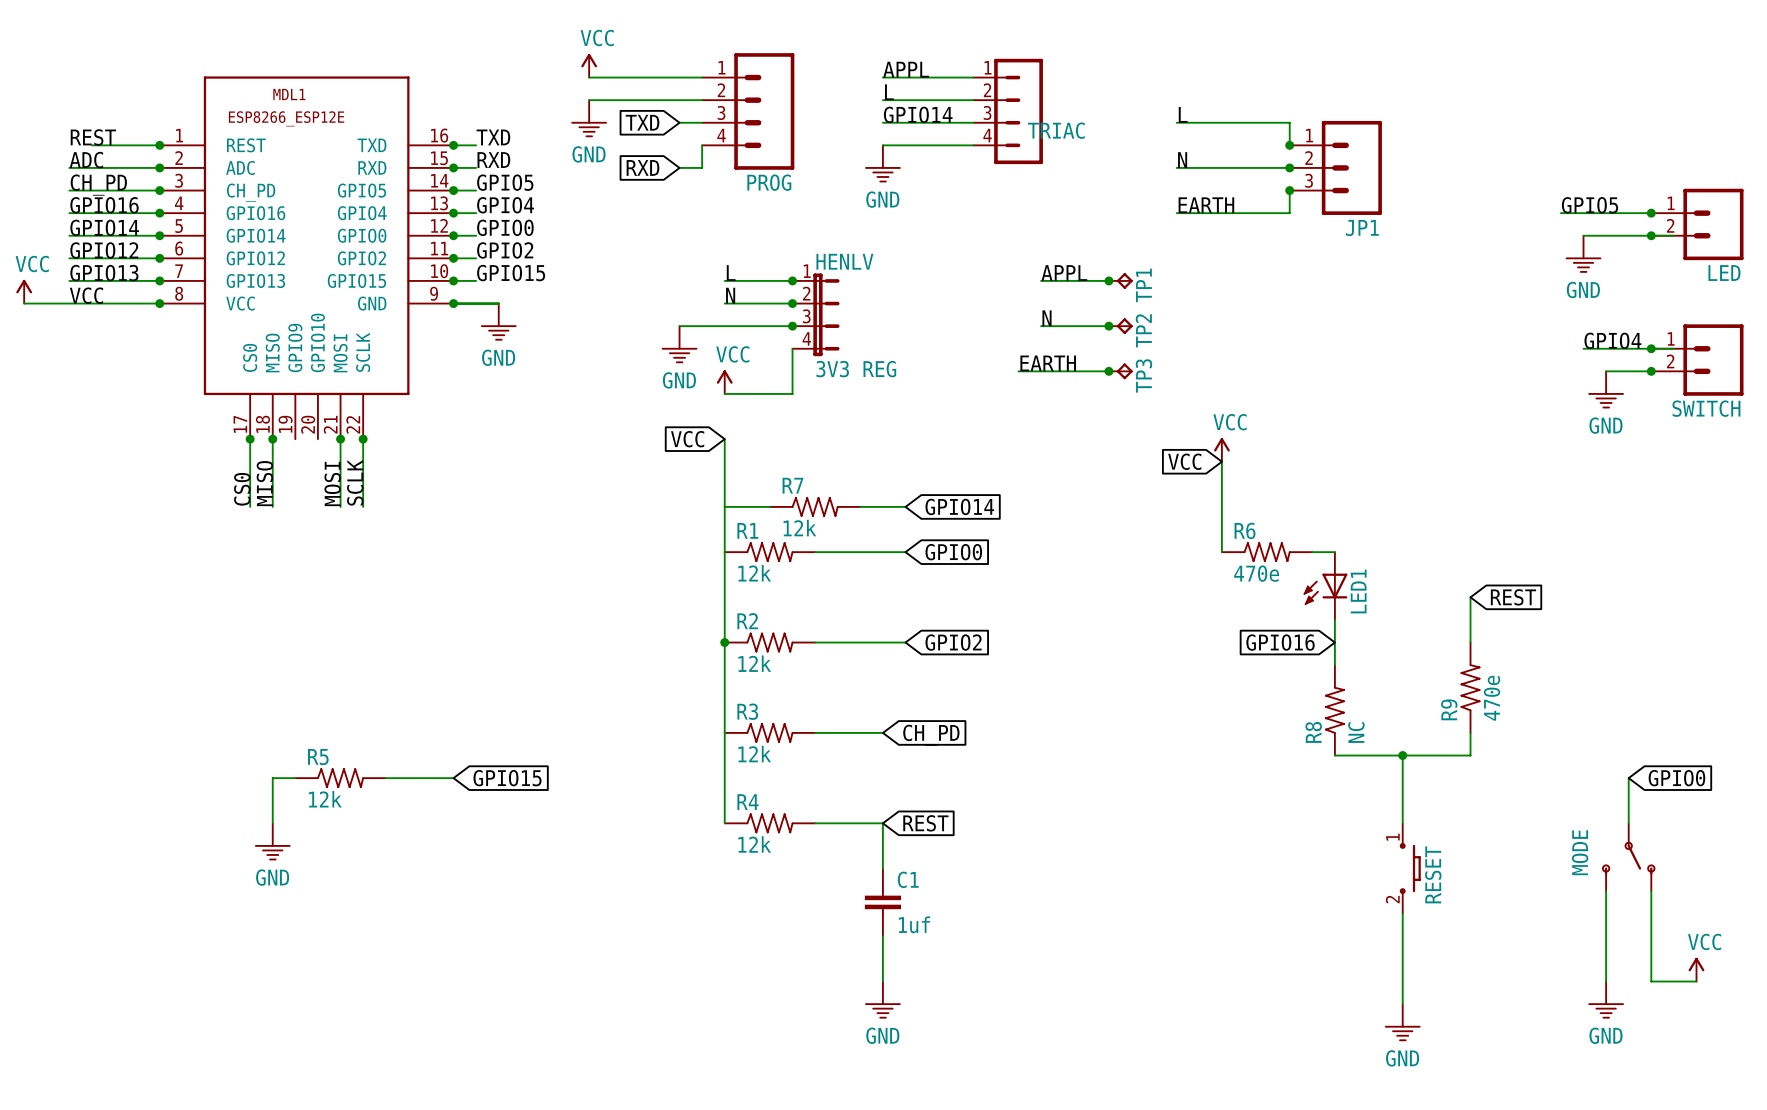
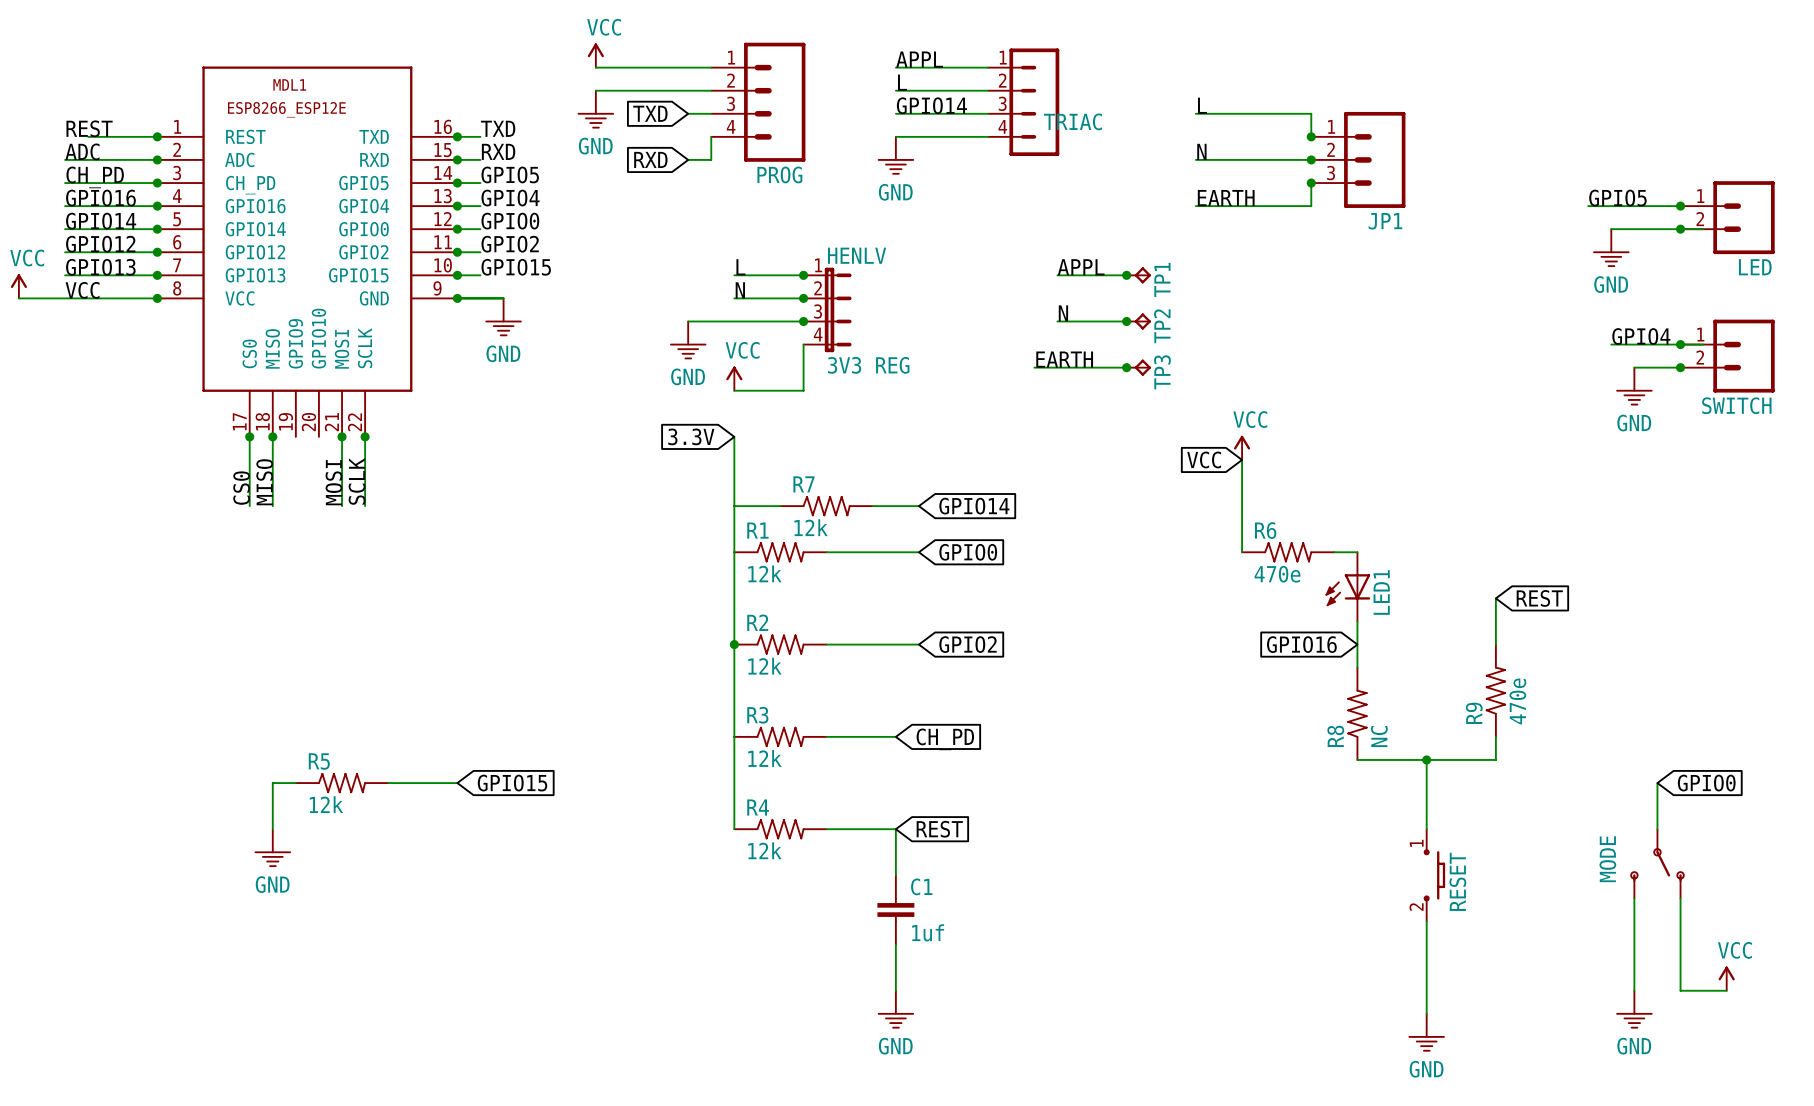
global label: VCC (687, 439) -> 3.3V (691, 436)

